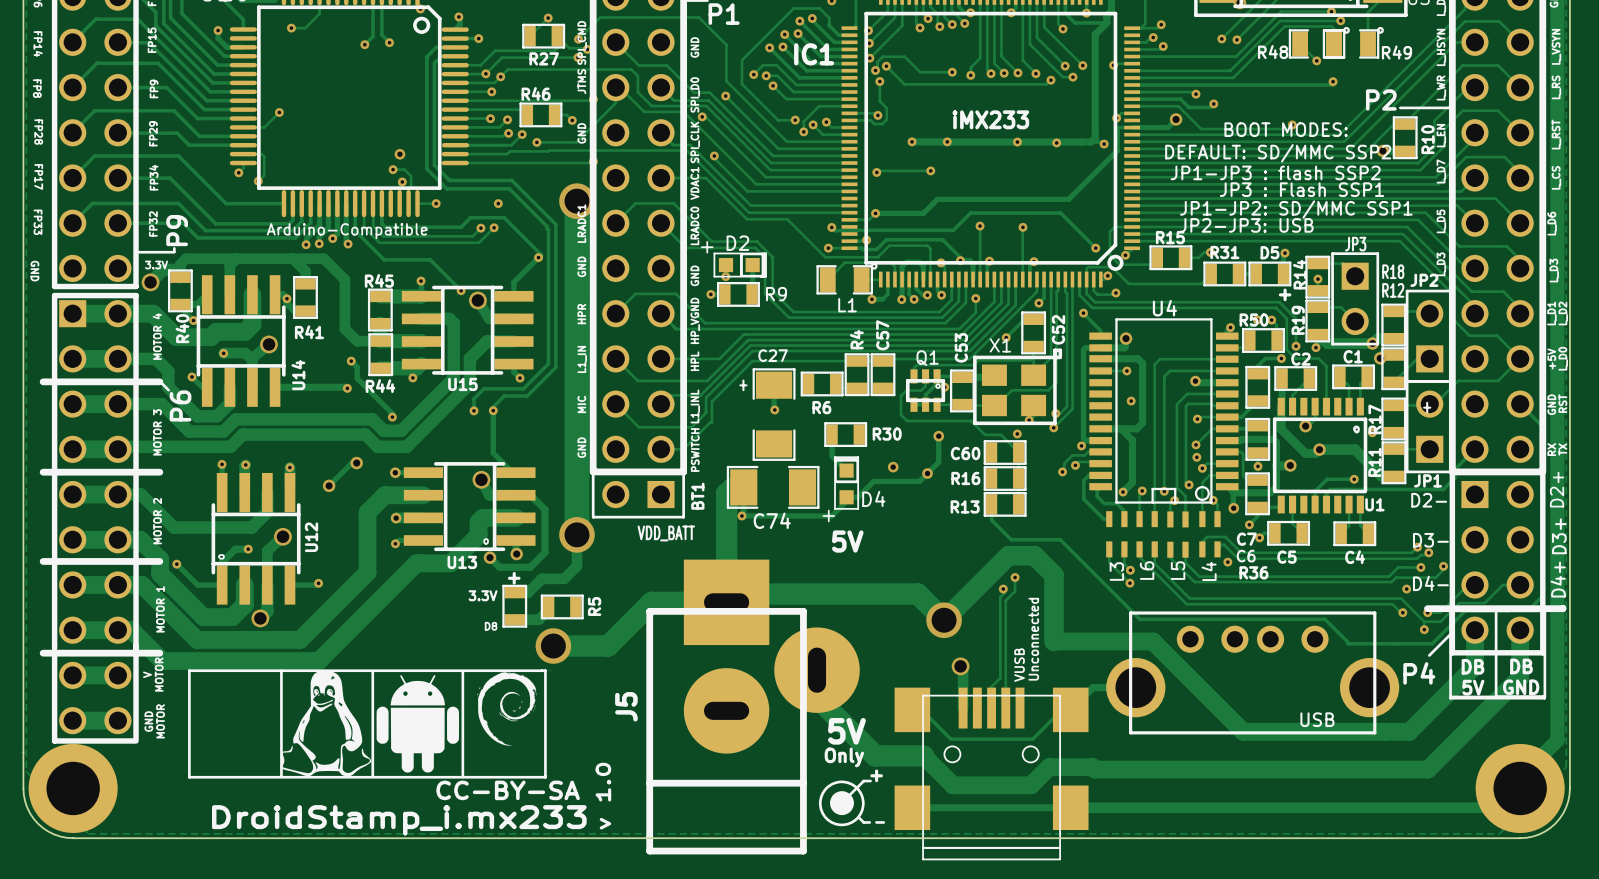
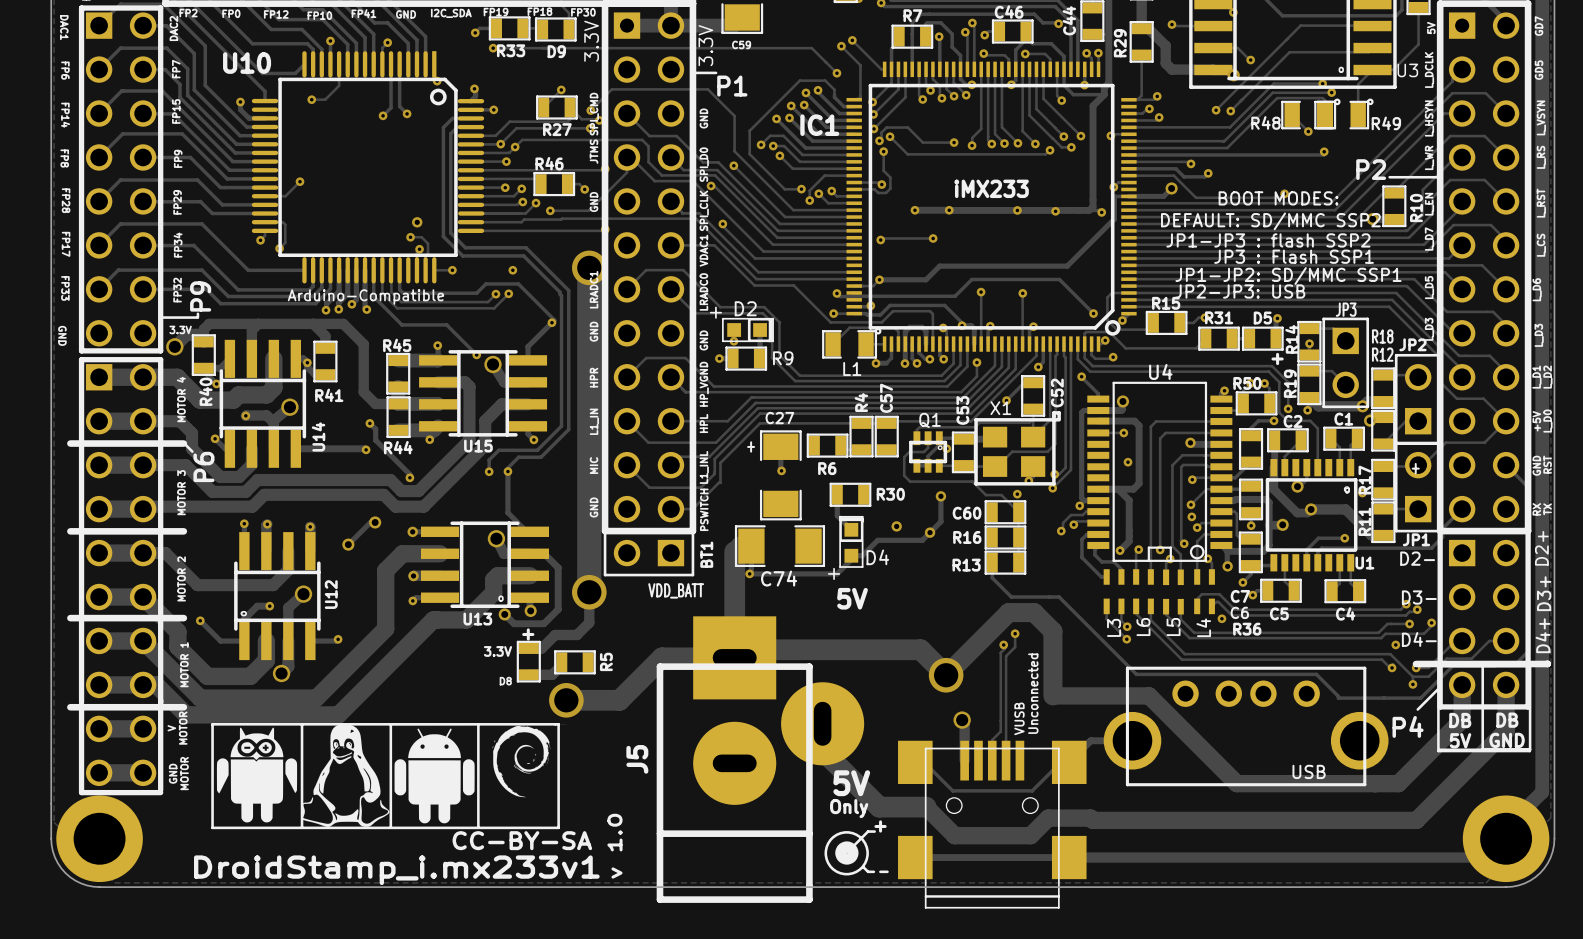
track: (117, 539) (140, 539) (160, 559) (160, 573) (203, 617) (232, 617) -> (143, 597) (177, 631) (177, 646) (207, 676) (250, 676) (254, 672)
track: (117, 584) (142, 584) (197, 639) (300, 639) -> (143, 640) (200, 698) (316, 698) (320, 694)
drawing: none -> [213, 724, 302, 827]
text: DroidStamp_i.mx233 (399, 820) -> DroidStamp_i.mx233v1 (396, 870)

